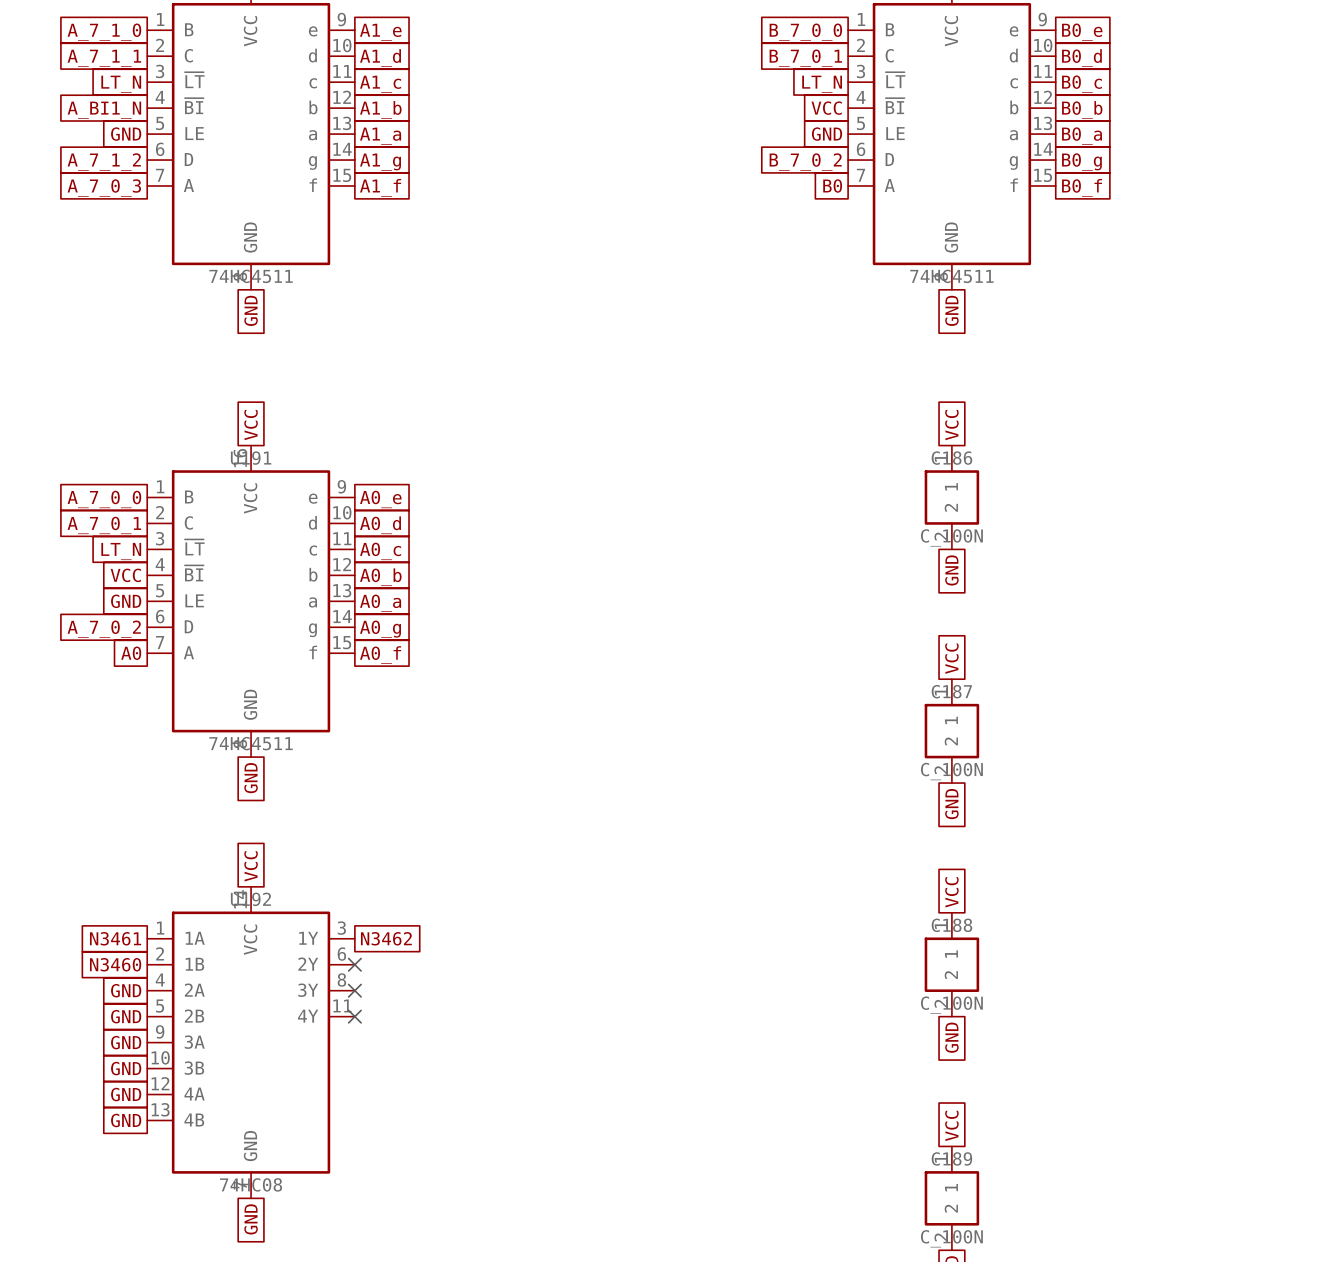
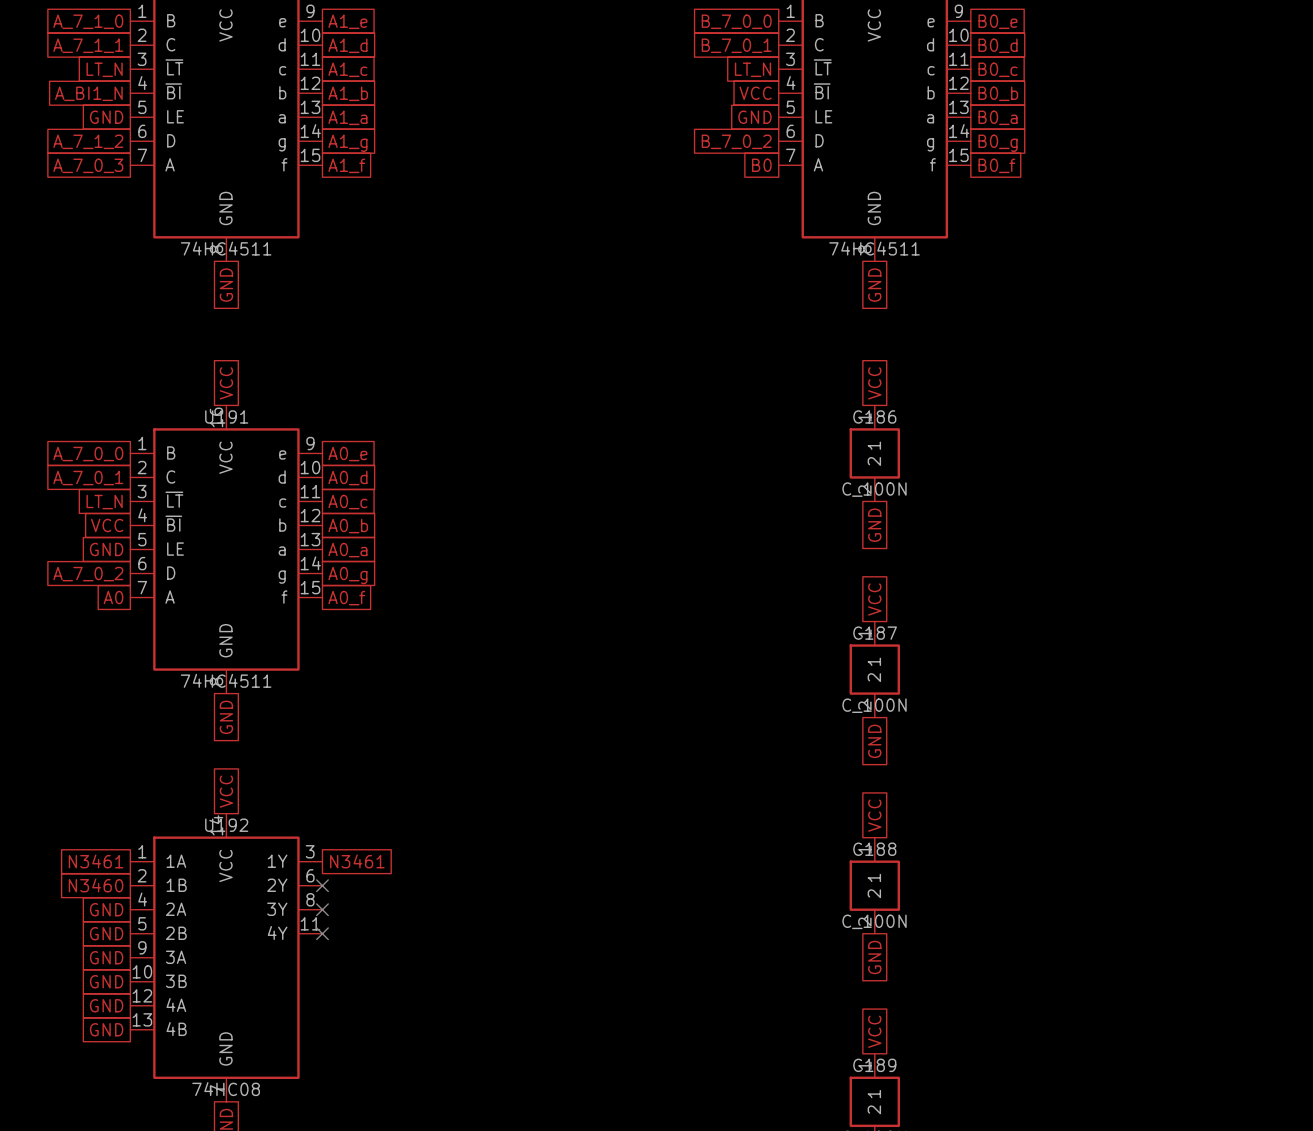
global label: N3462 (386, 938) -> N3461 (357, 861)

